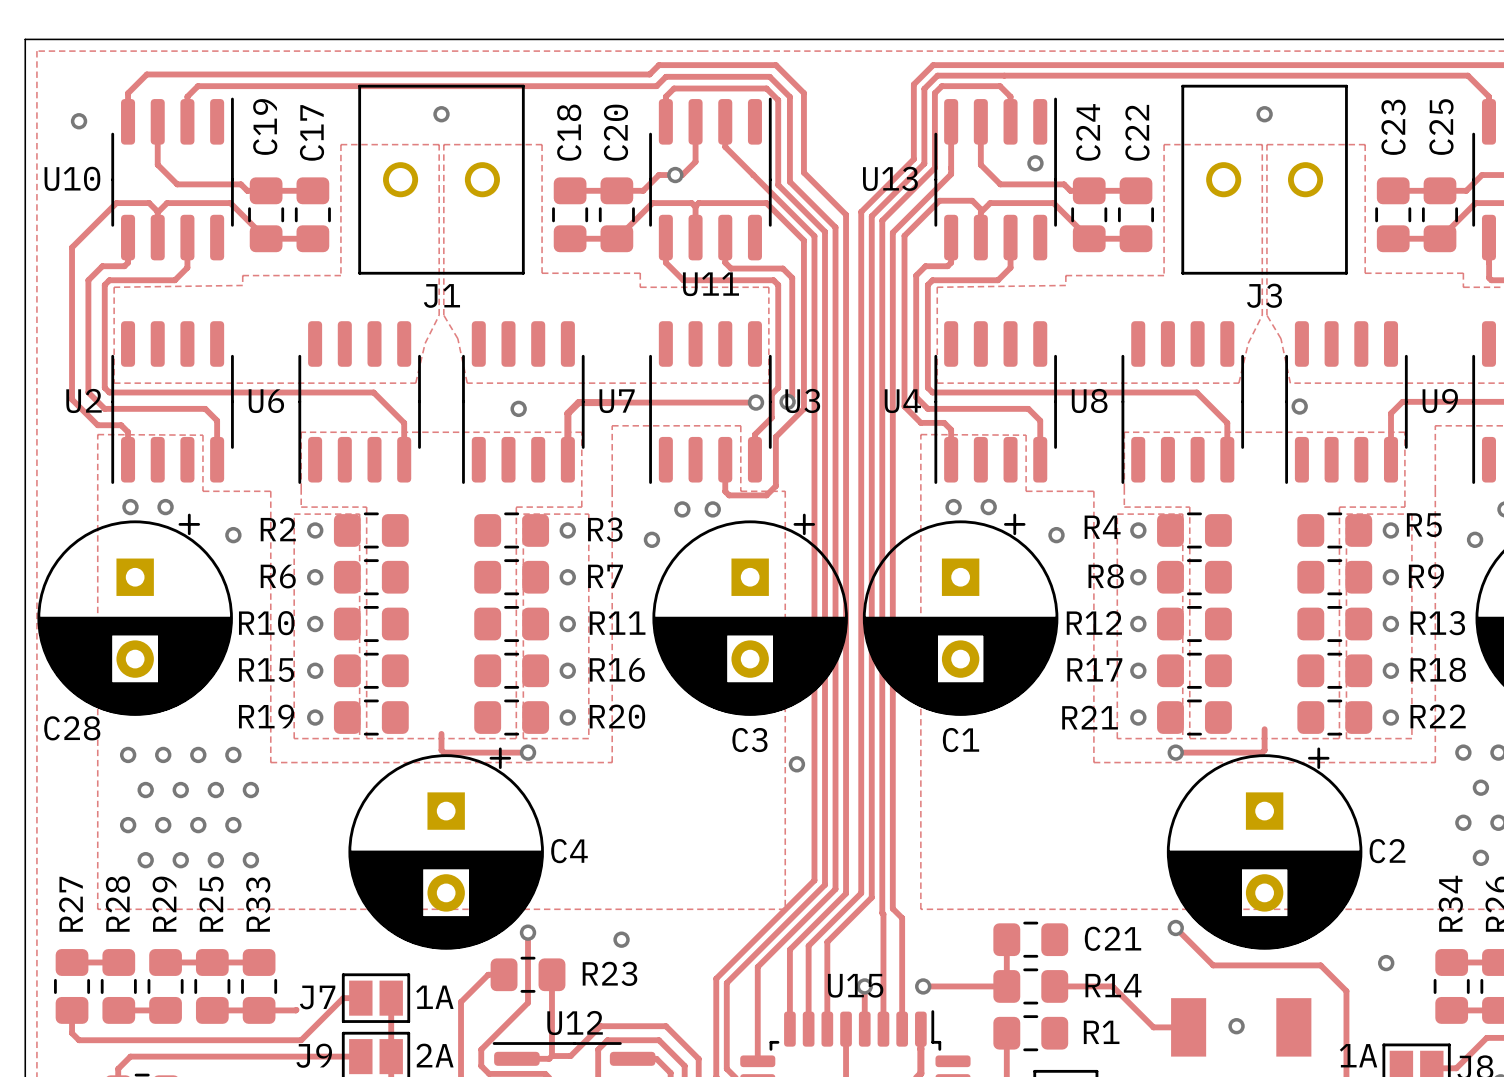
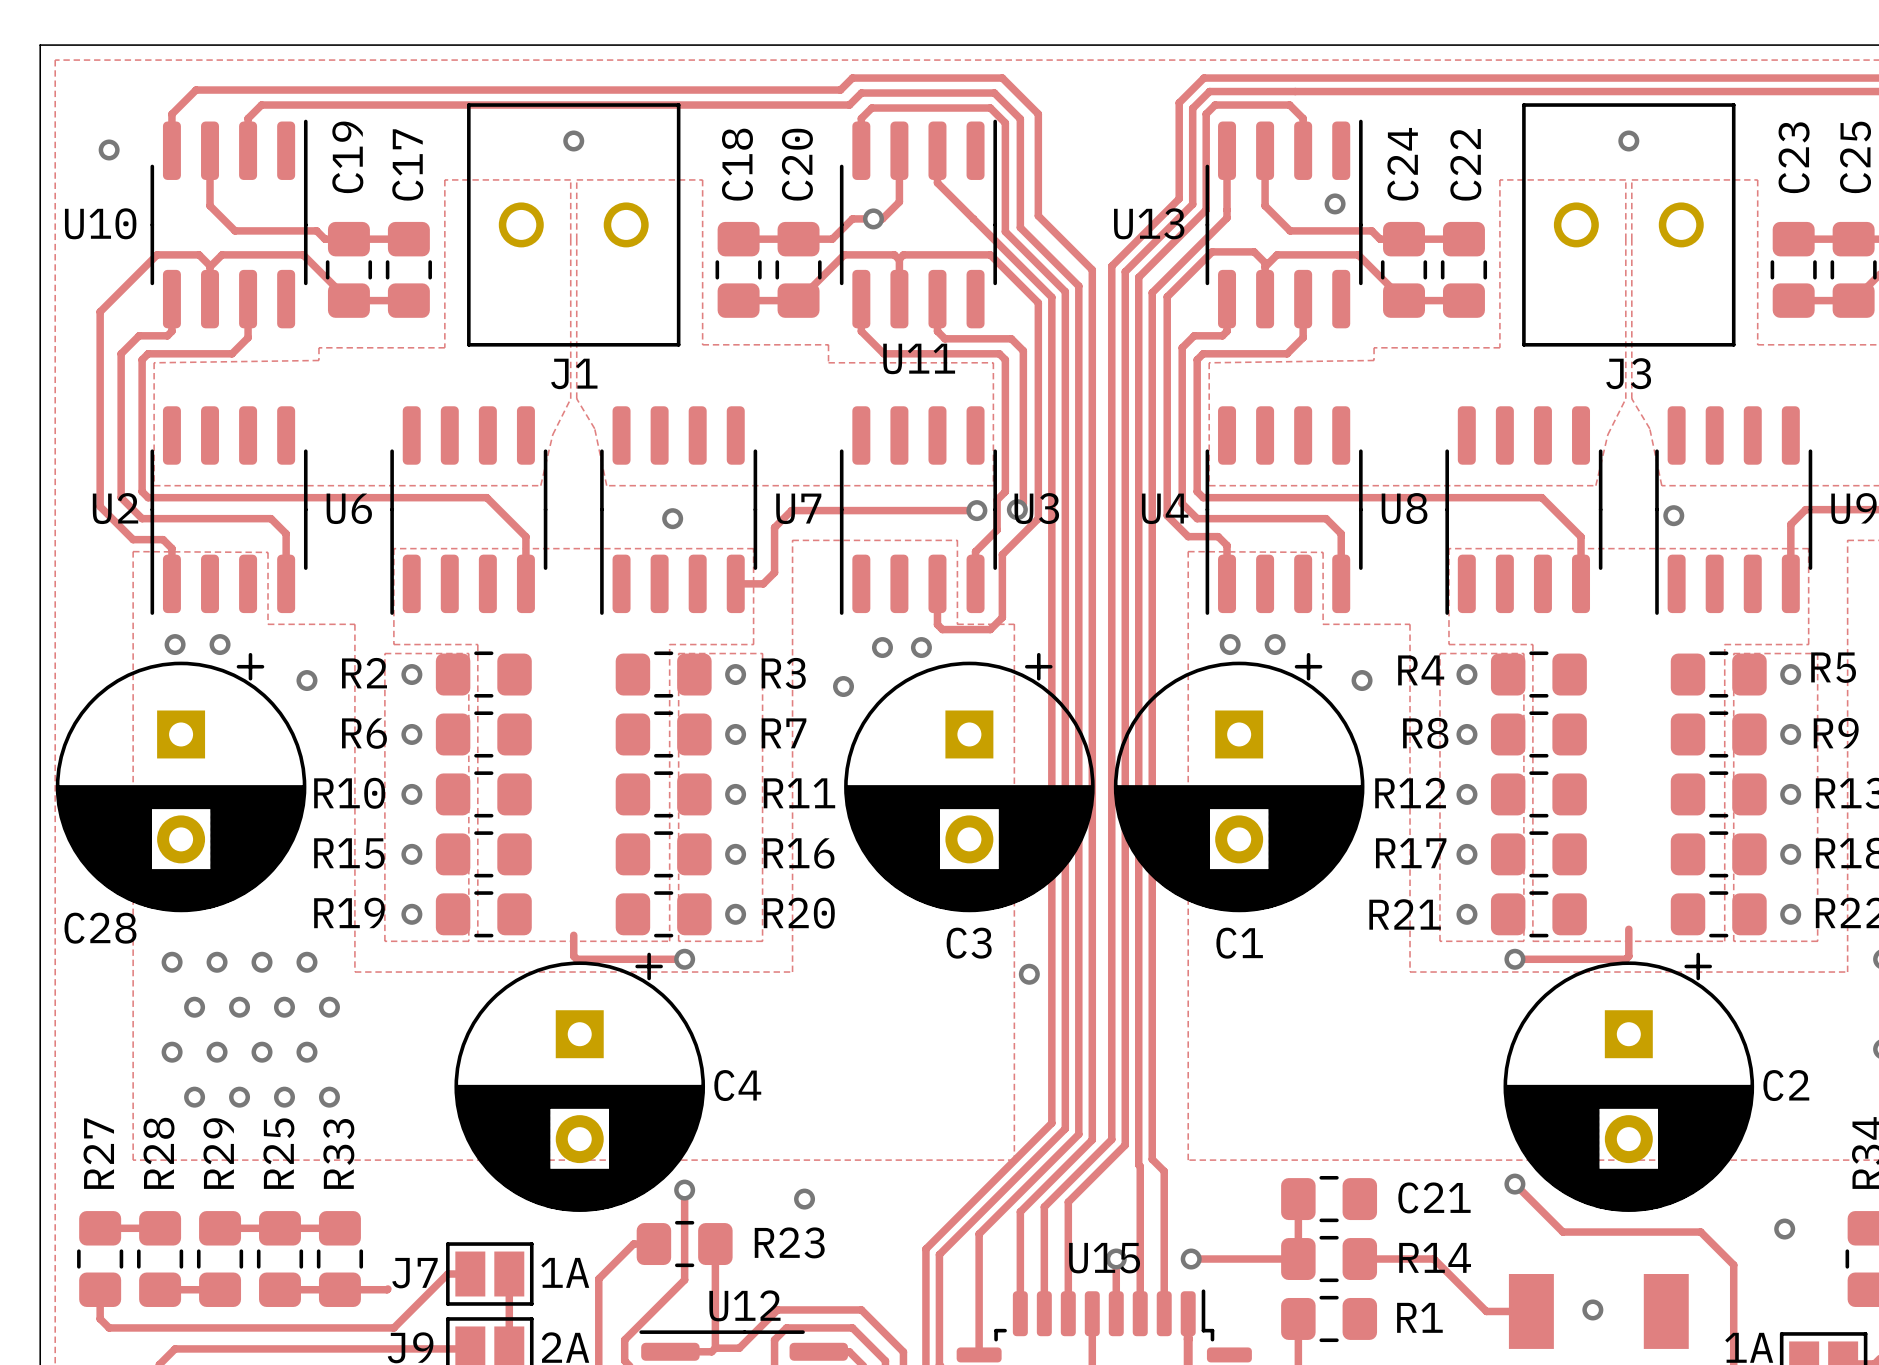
track: (611, 402) (578, 402) (567, 413) (567, 459) -> (791, 510) (774, 527) (774, 572) (763, 583) (735, 583)

